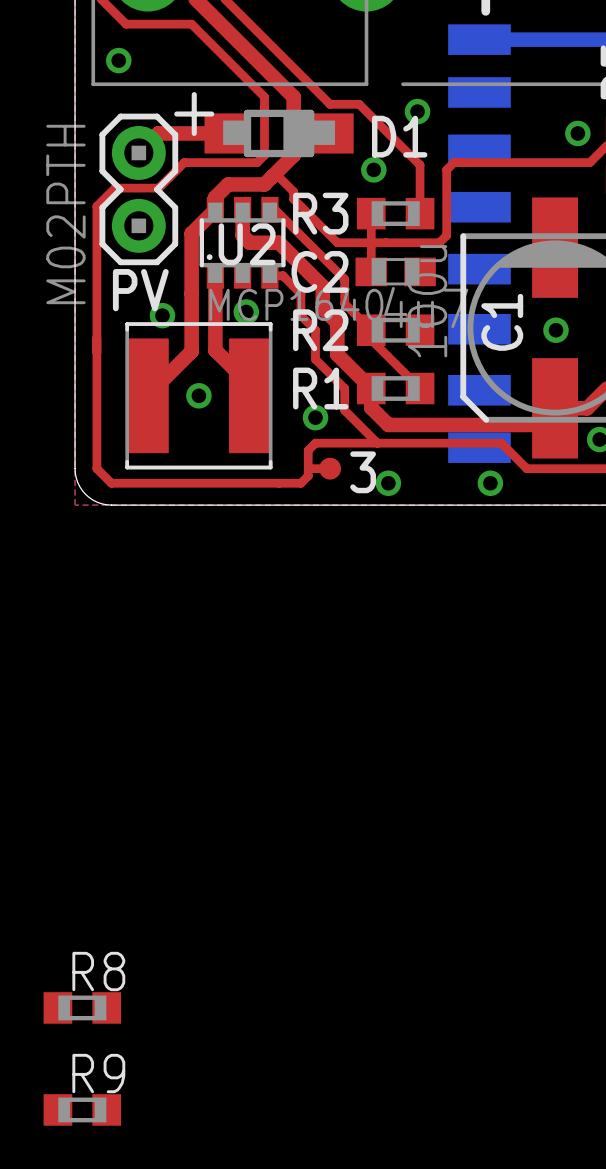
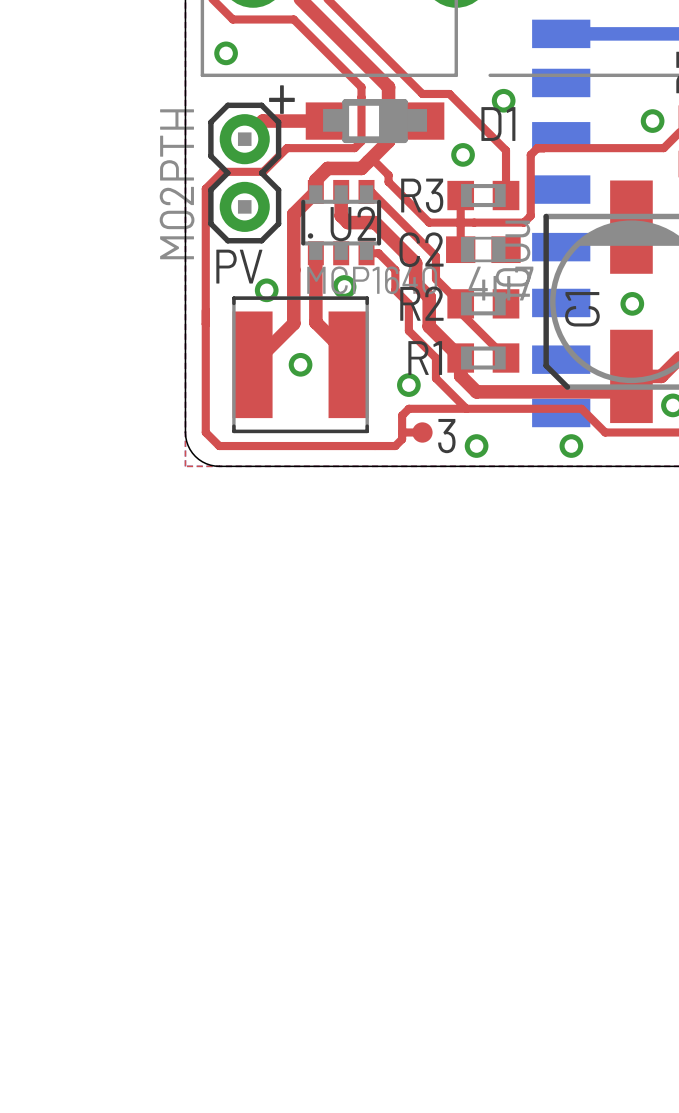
R8: (82, 1007) -> none
R9: (82, 1109) -> none

